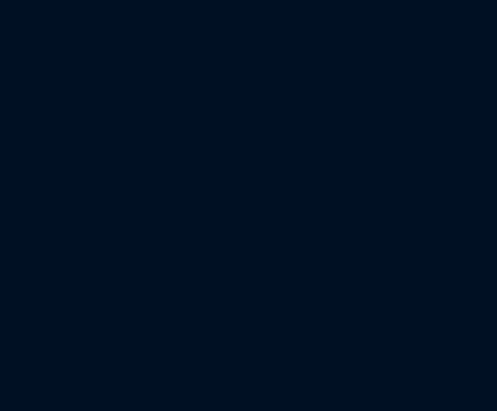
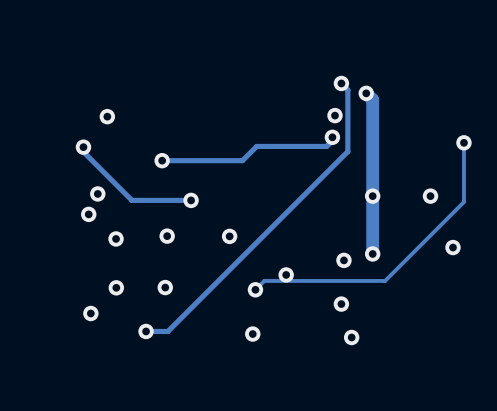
track: none -> (341, 83) (347, 89) (347, 151) (167, 331) (146, 331)
via: none -> (341, 83)
track: none -> (366, 93) (372, 99) (372, 253)
via: none -> (366, 93)
via: none -> (335, 115)
via: none -> (107, 116)
track: none -> (332, 137) (326, 146) (256, 146) (242, 160) (162, 160)
via: none -> (332, 137)
track: none -> (463, 142) (463, 202) (385, 280) (264, 280) (255, 289)
via: none -> (463, 142)
track: none -> (83, 147) (83, 151) (131, 200) (191, 200)
via: none -> (83, 147)
via: none -> (162, 160)
via: none -> (97, 193)
via: none -> (372, 196)
via: none -> (430, 196)
via: none -> (191, 200)
via: none -> (88, 214)
via: none -> (167, 236)
via: none -> (229, 236)
via: none -> (116, 238)
via: none -> (452, 247)
via: none -> (372, 253)
via: none -> (343, 260)
via: none -> (286, 274)
via: none -> (116, 287)
via: none -> (165, 287)
via: none -> (255, 289)
via: none -> (341, 304)
via: none -> (90, 313)
via: none -> (146, 331)
via: none -> (252, 334)
via: none -> (351, 337)

